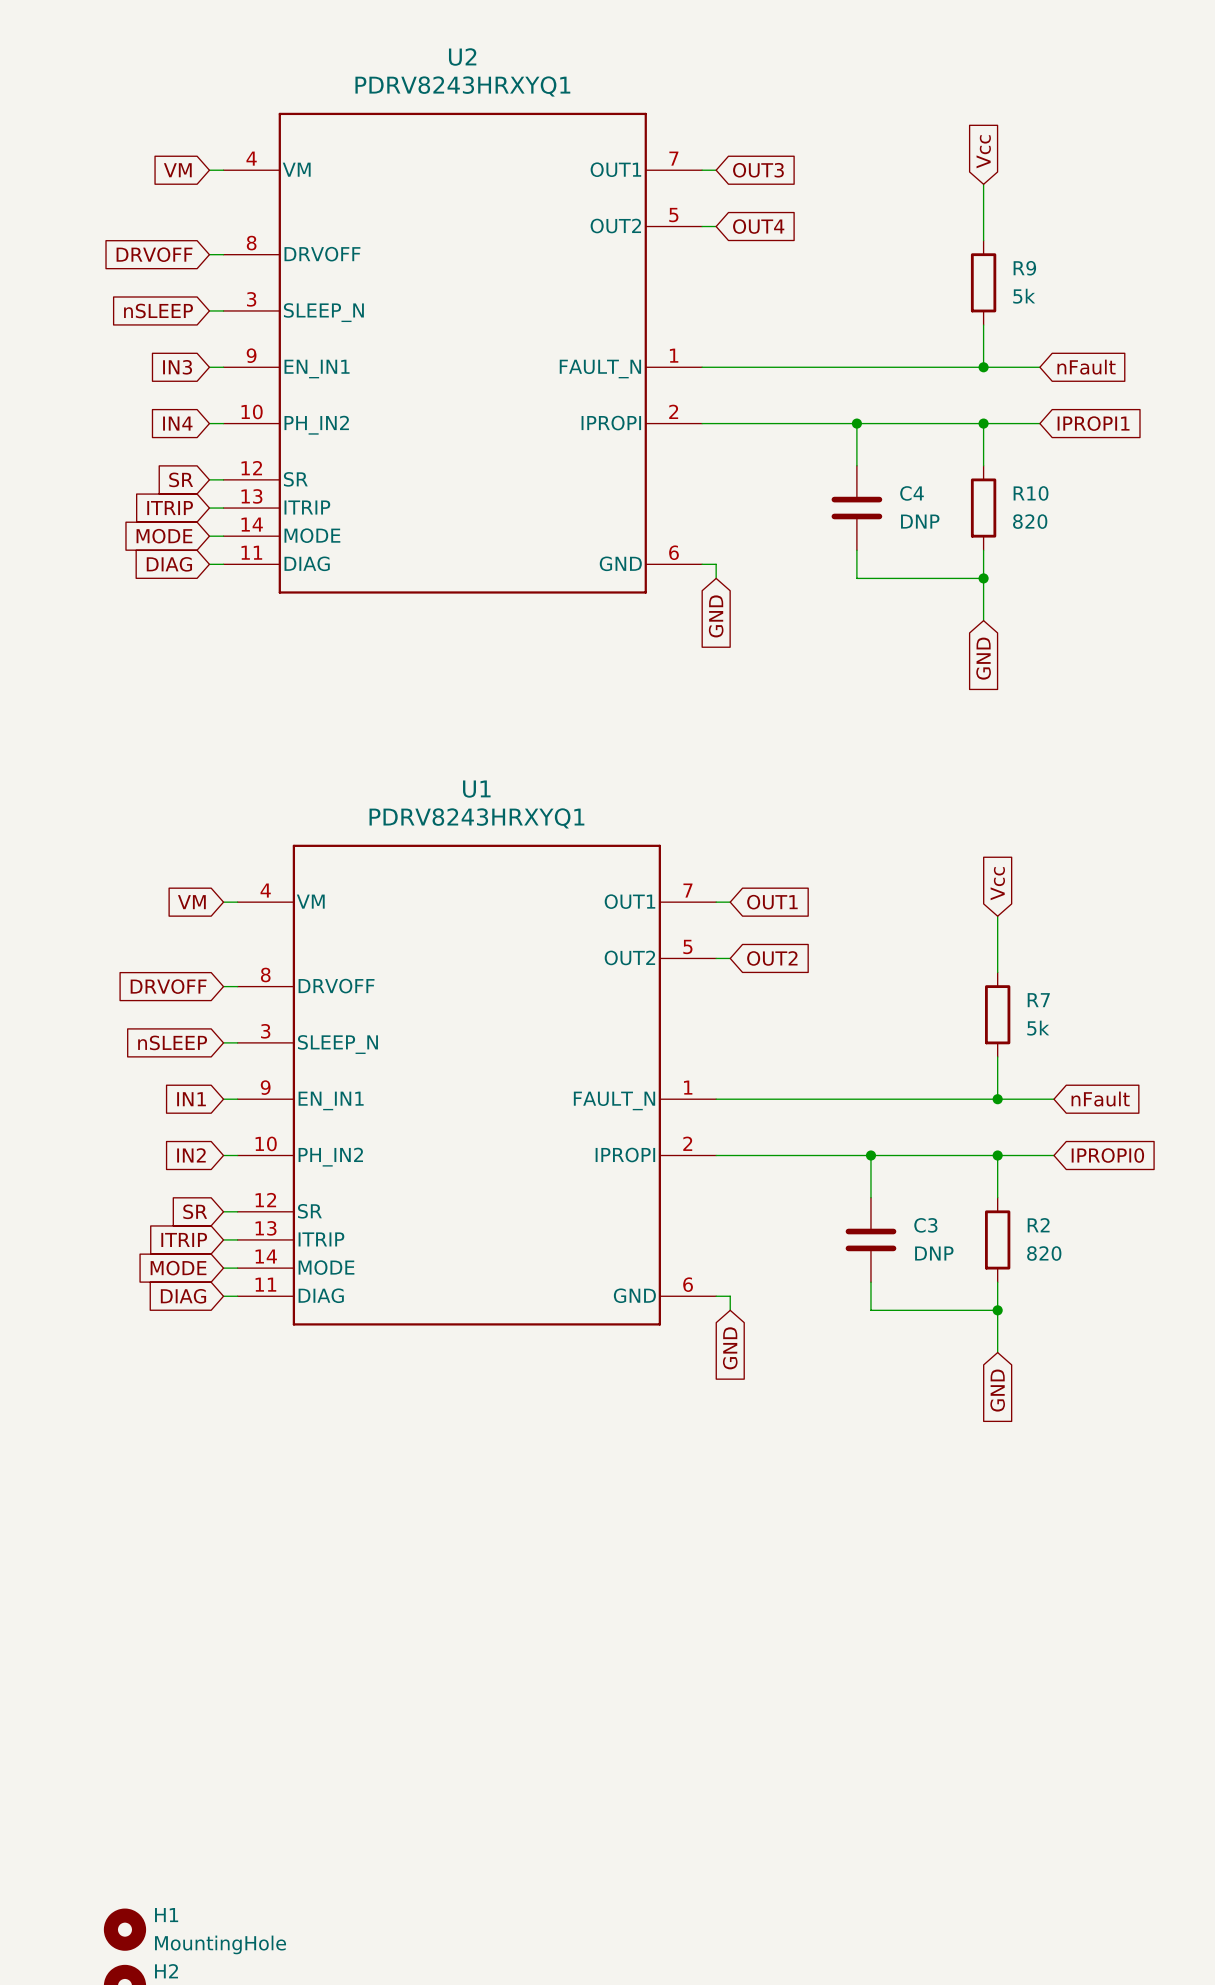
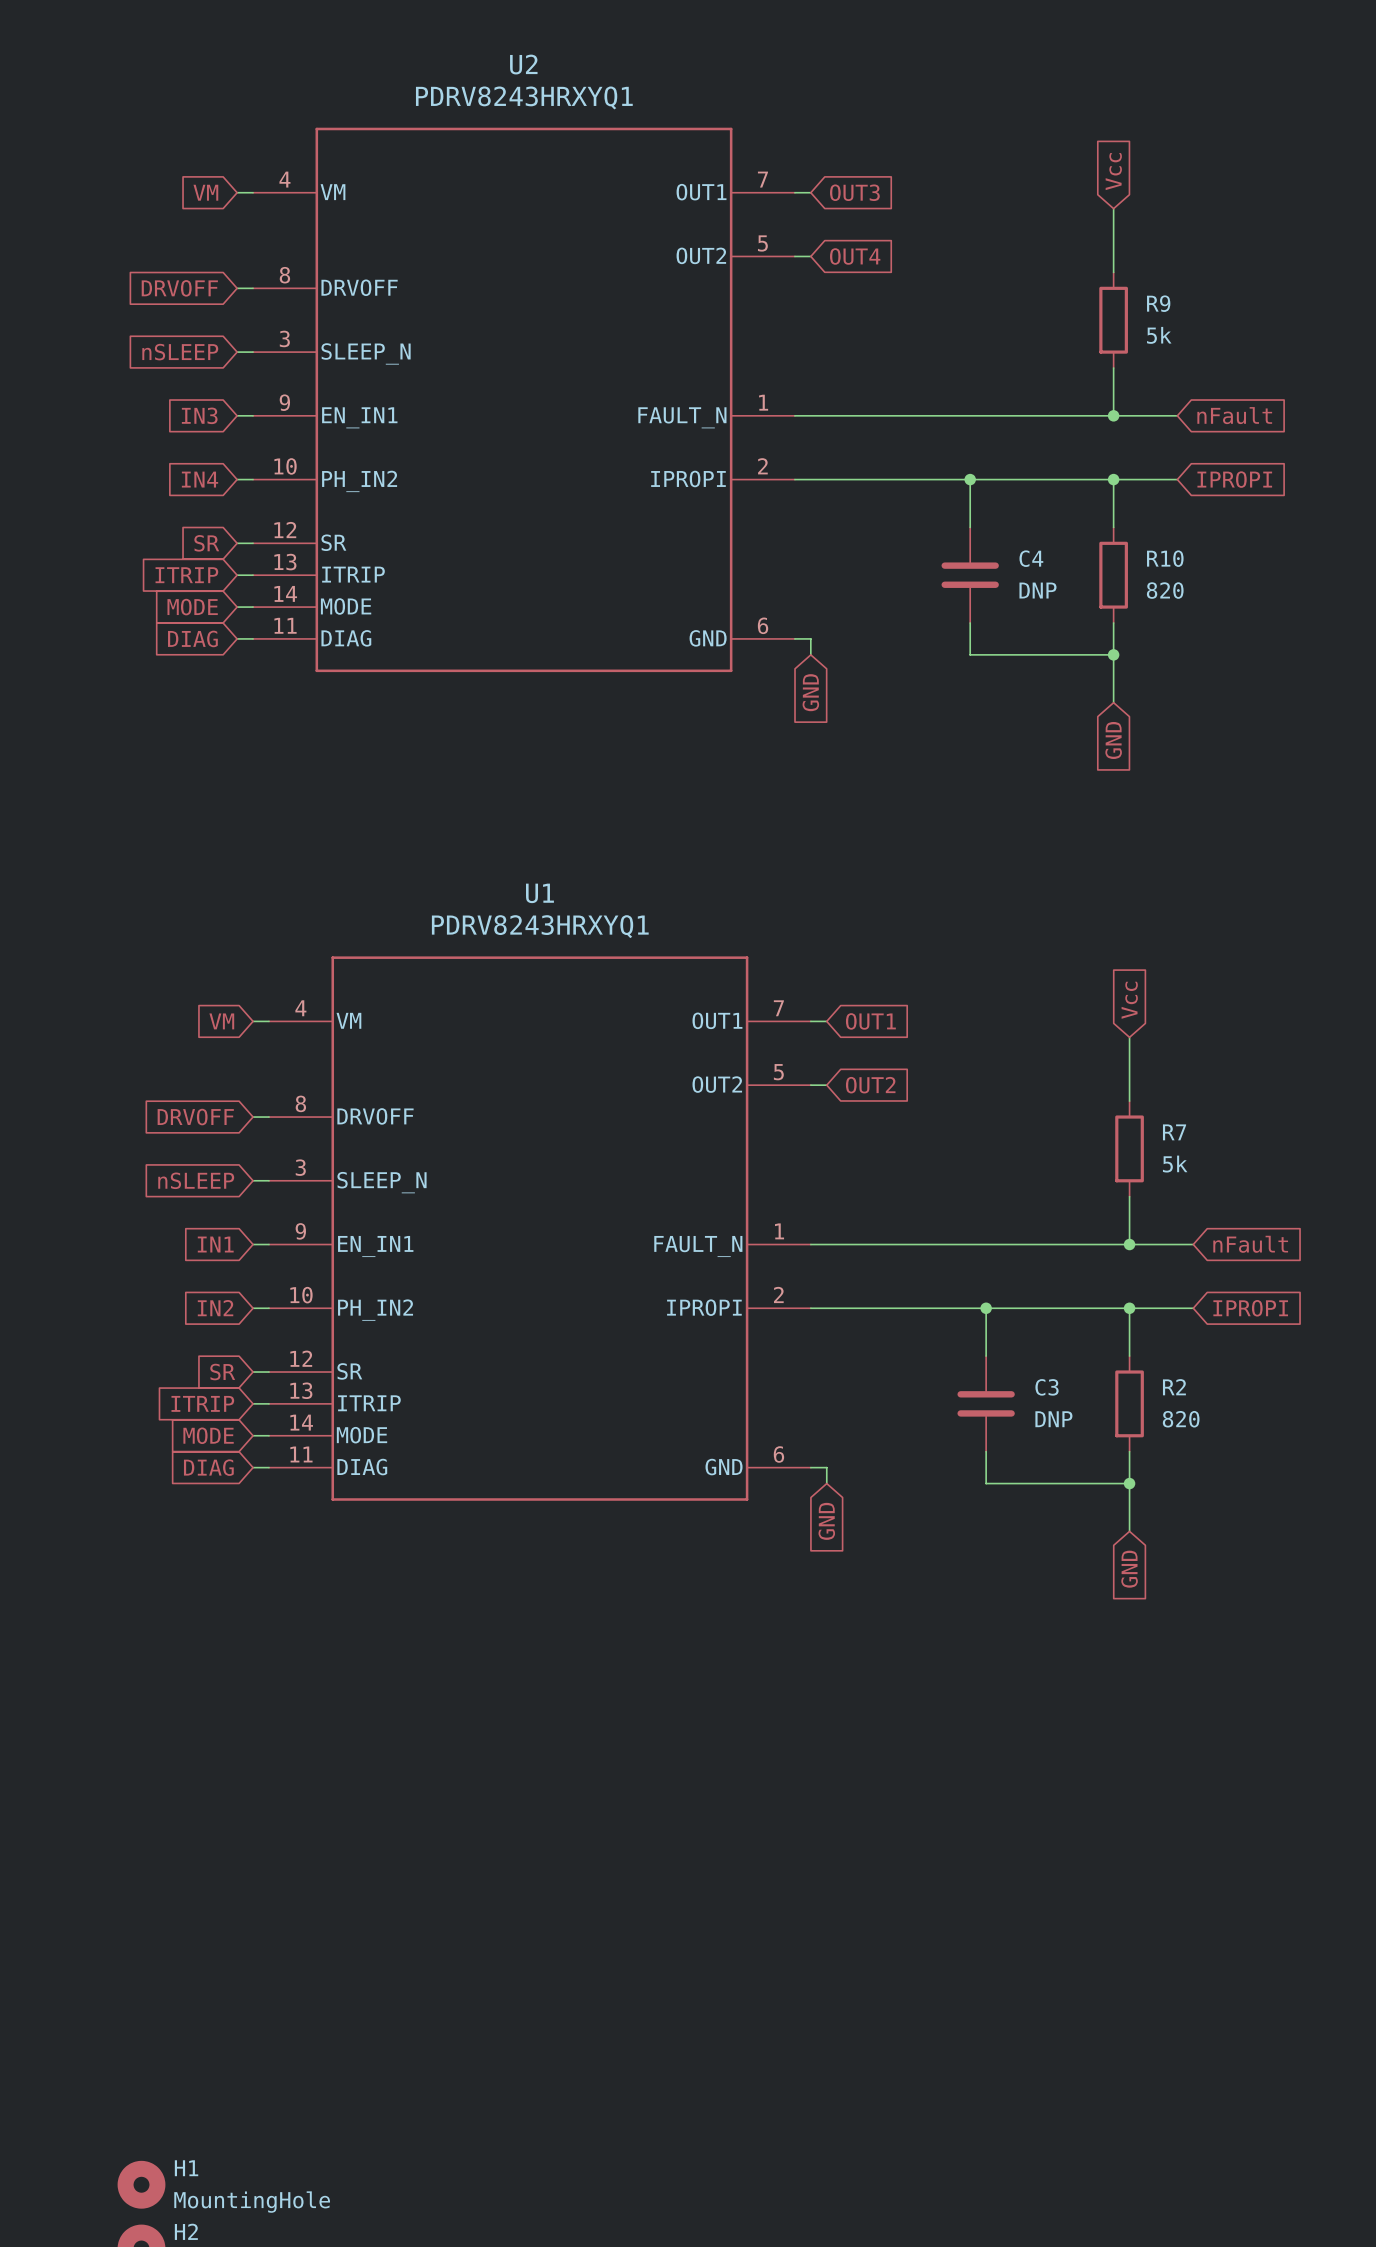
global label: IPROPI1 (1093, 423) -> IPROPI (1234, 479)
global label: IPROPI0 (1107, 1155) -> IPROPI (1250, 1308)

